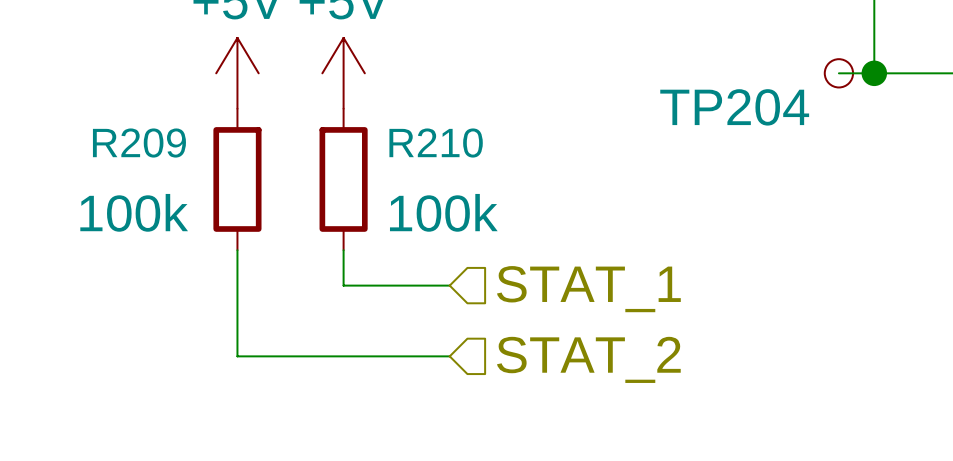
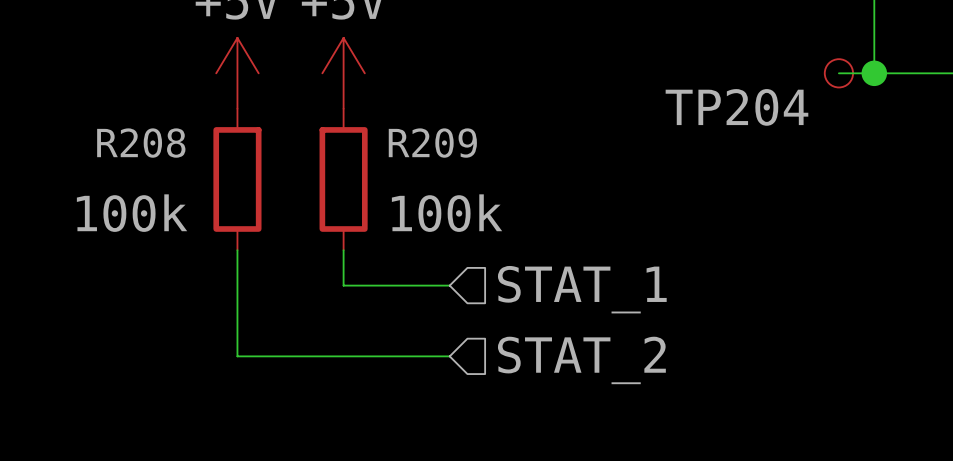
R209 name: R209 (139, 143) -> R208 (141, 143)
R210 name: R210 (436, 143) -> R209 (432, 143)

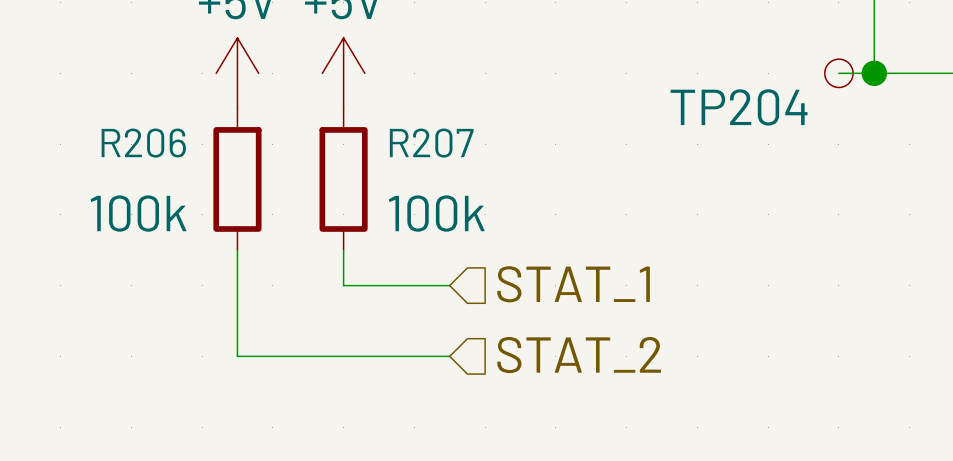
R208 name: R208 (141, 143) -> R206 (143, 143)
R209 name: R209 (432, 143) -> R207 (431, 143)

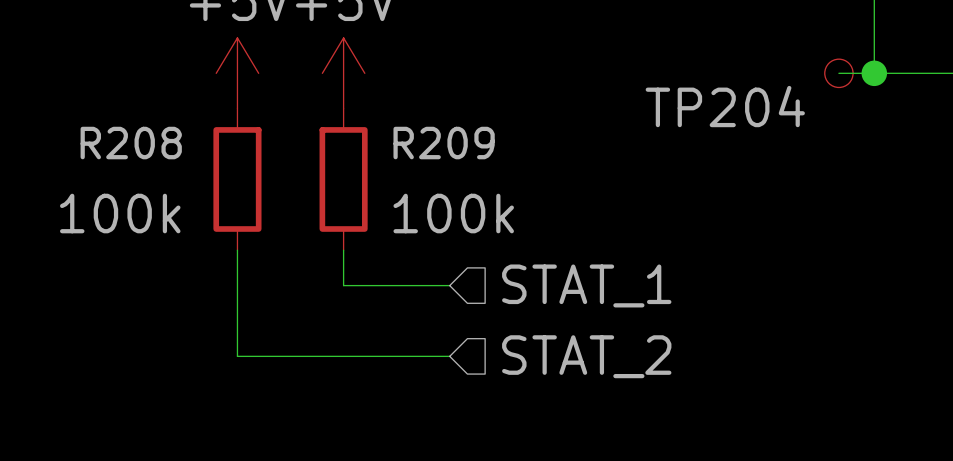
R206 name: R206 (143, 143) -> R208 (131, 143)
R207 name: R207 (431, 143) -> R209 (444, 143)

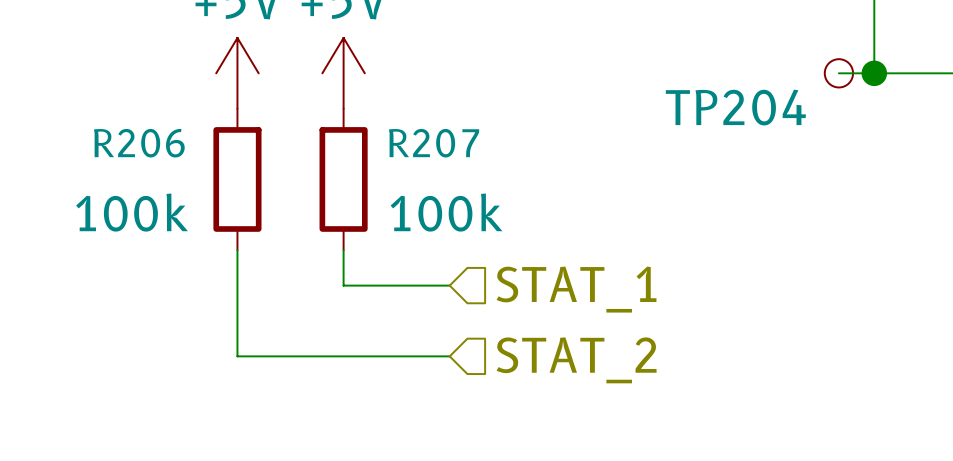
R208 name: R208 (131, 143) -> R206 (139, 143)
R209 name: R209 (444, 143) -> R207 (434, 143)

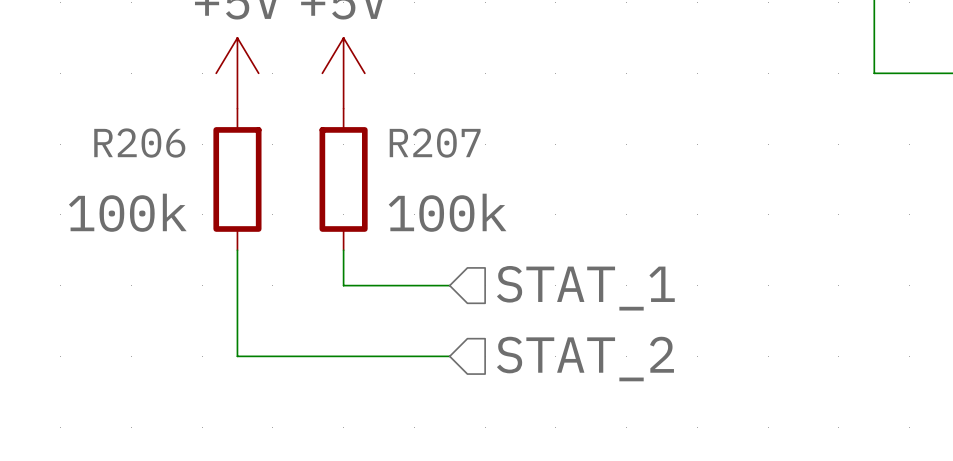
wire: (838, 73) (874, 73) -> none
TP204: (838, 73) -> none
junction: (874, 73) -> none

